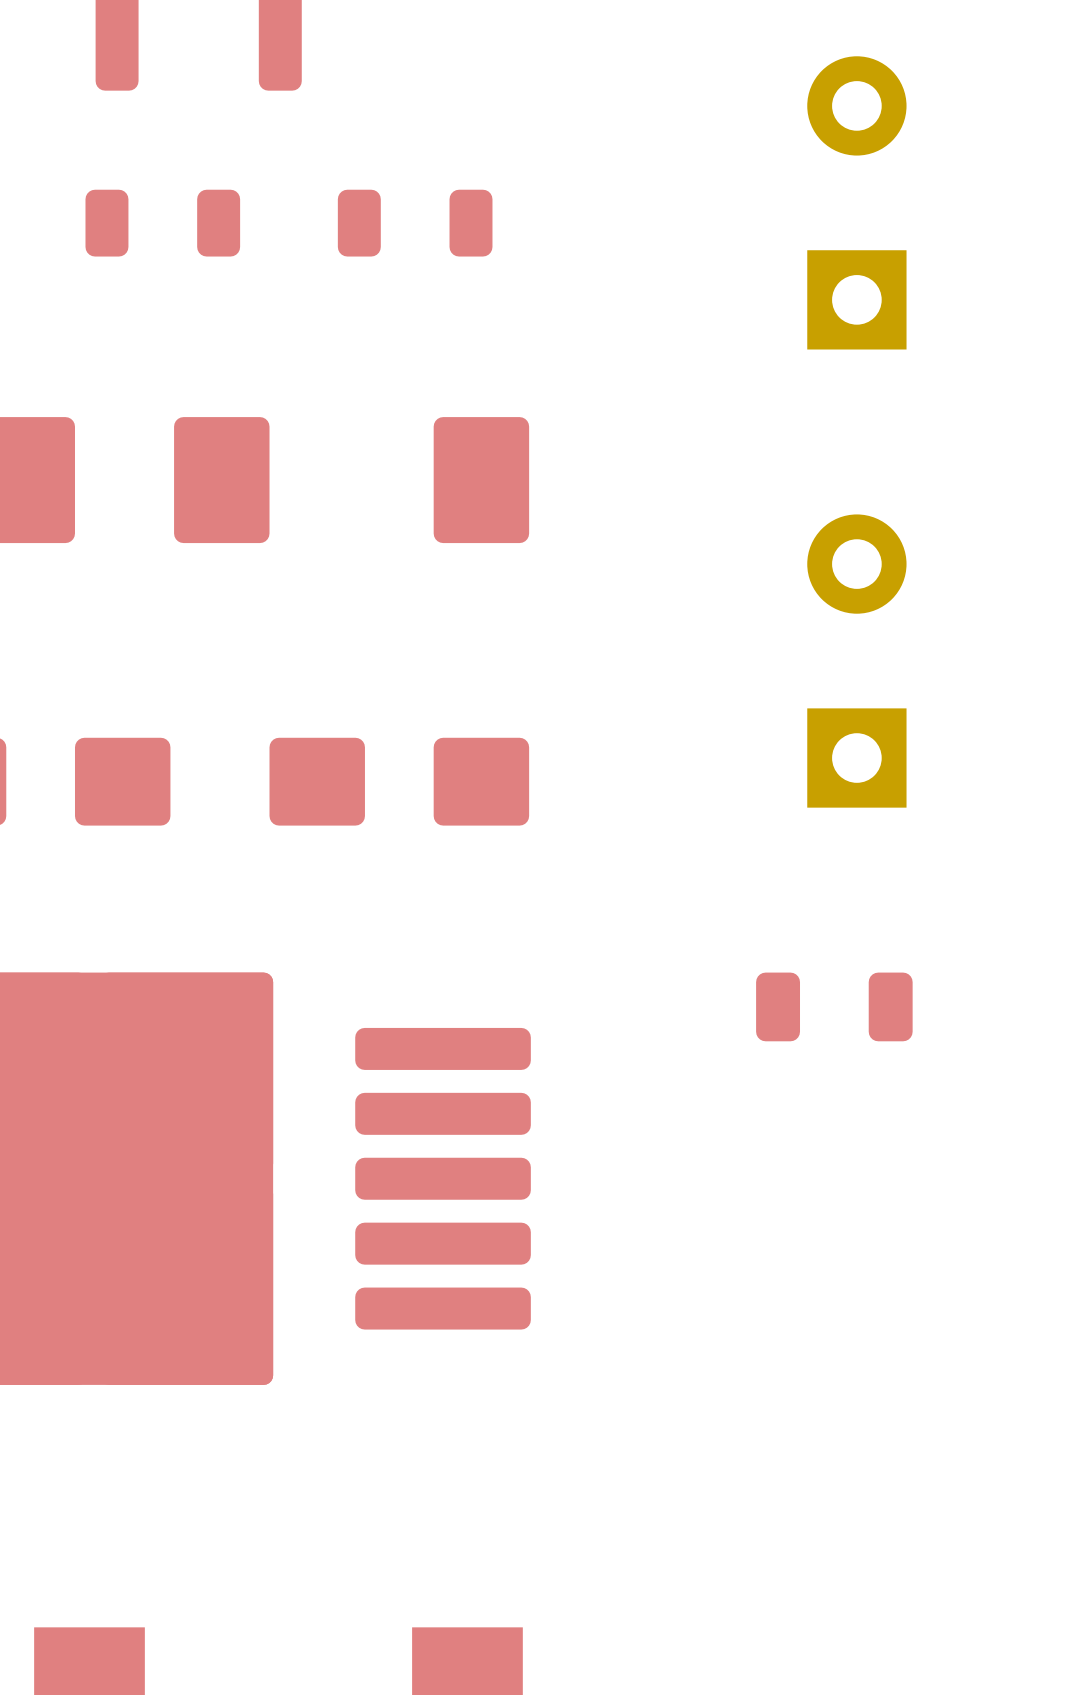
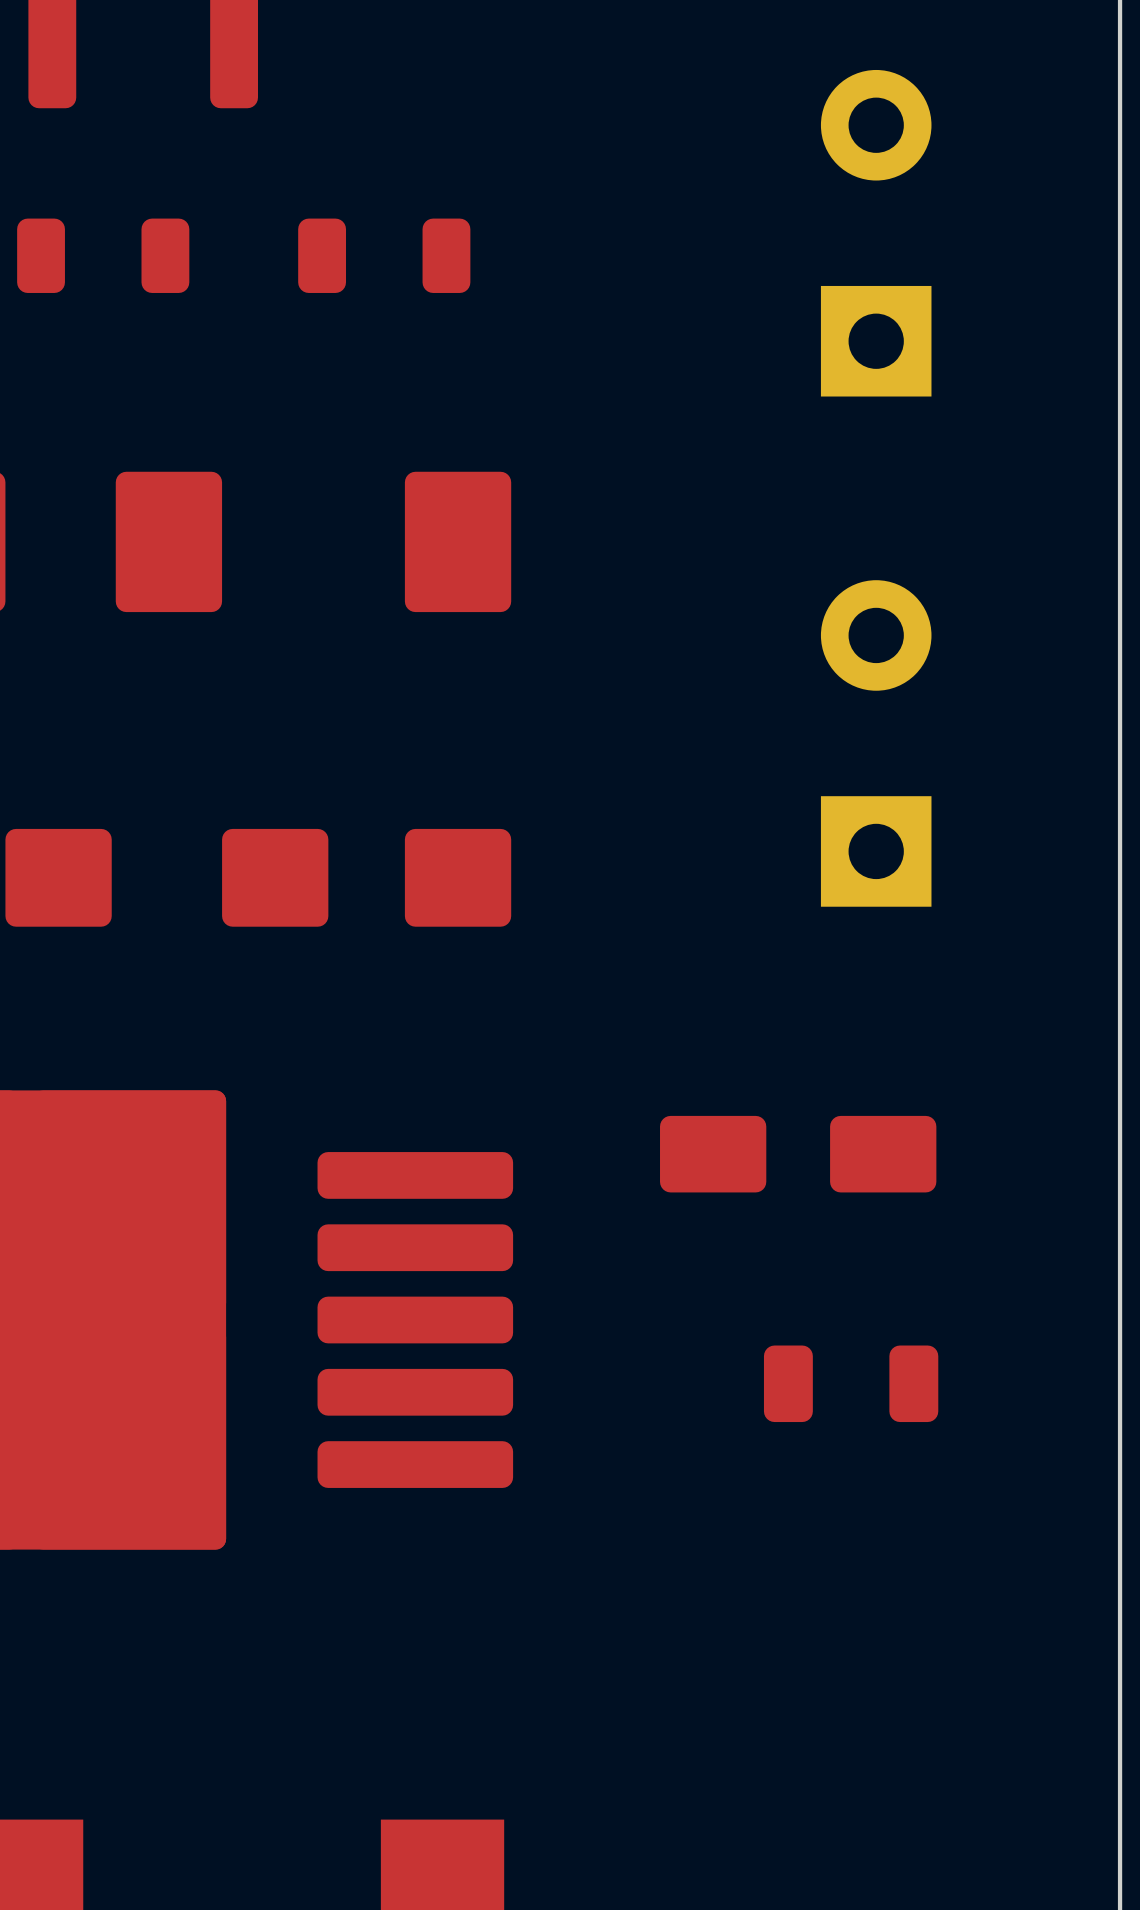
part position: (834, 1006) -> (851, 1383)
part: none -> (798, 1154)

